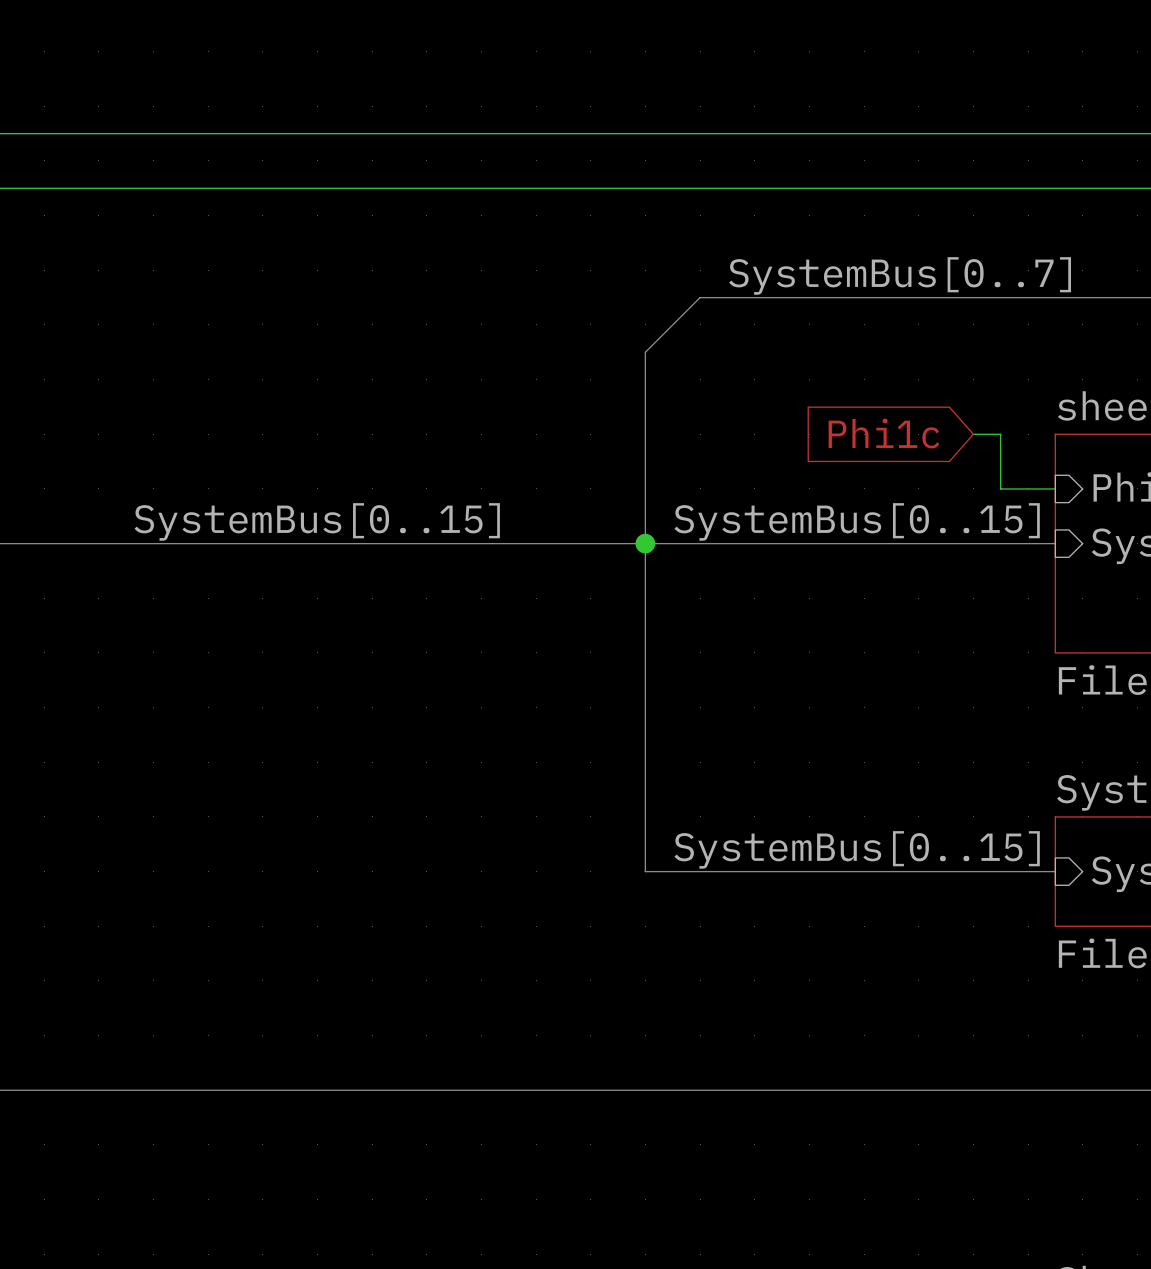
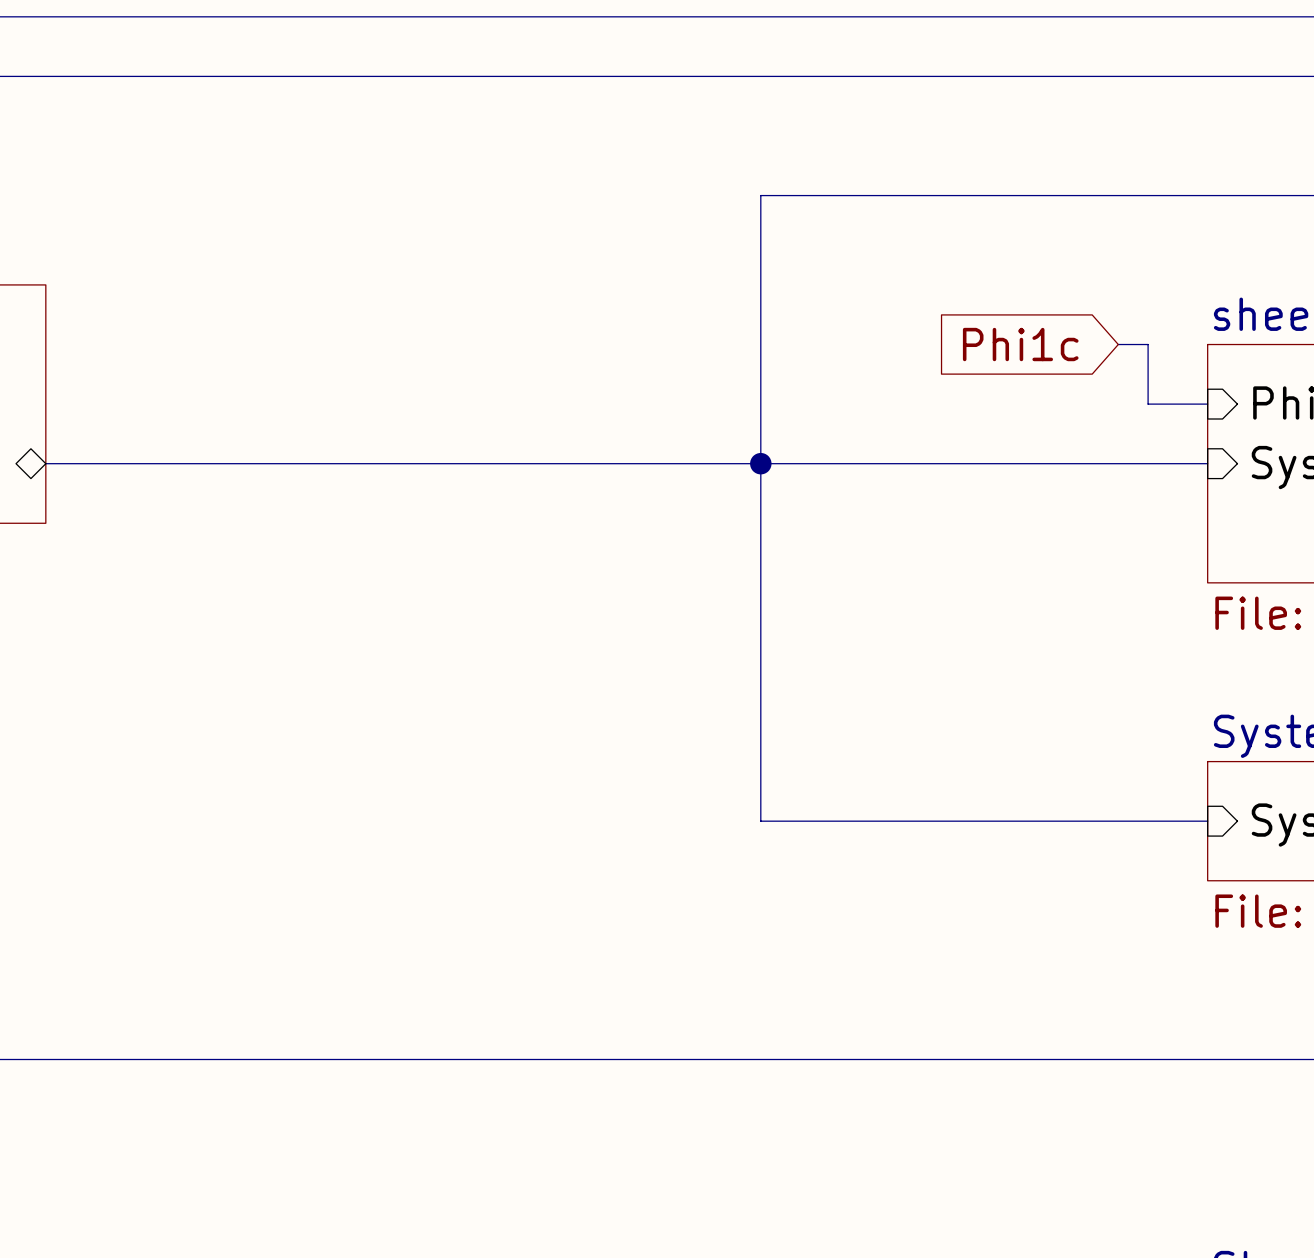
label: SystemBus[0..7] (900, 275) -> none
bus: (700, 297) (645, 352) -> (820, 195) (760, 195) (760, 255)
label: SystemBus[0..15] (317, 521) -> none
label: SystemBus[0..15] (857, 521) -> none
label: SystemBus[0..15] (857, 849) -> none

